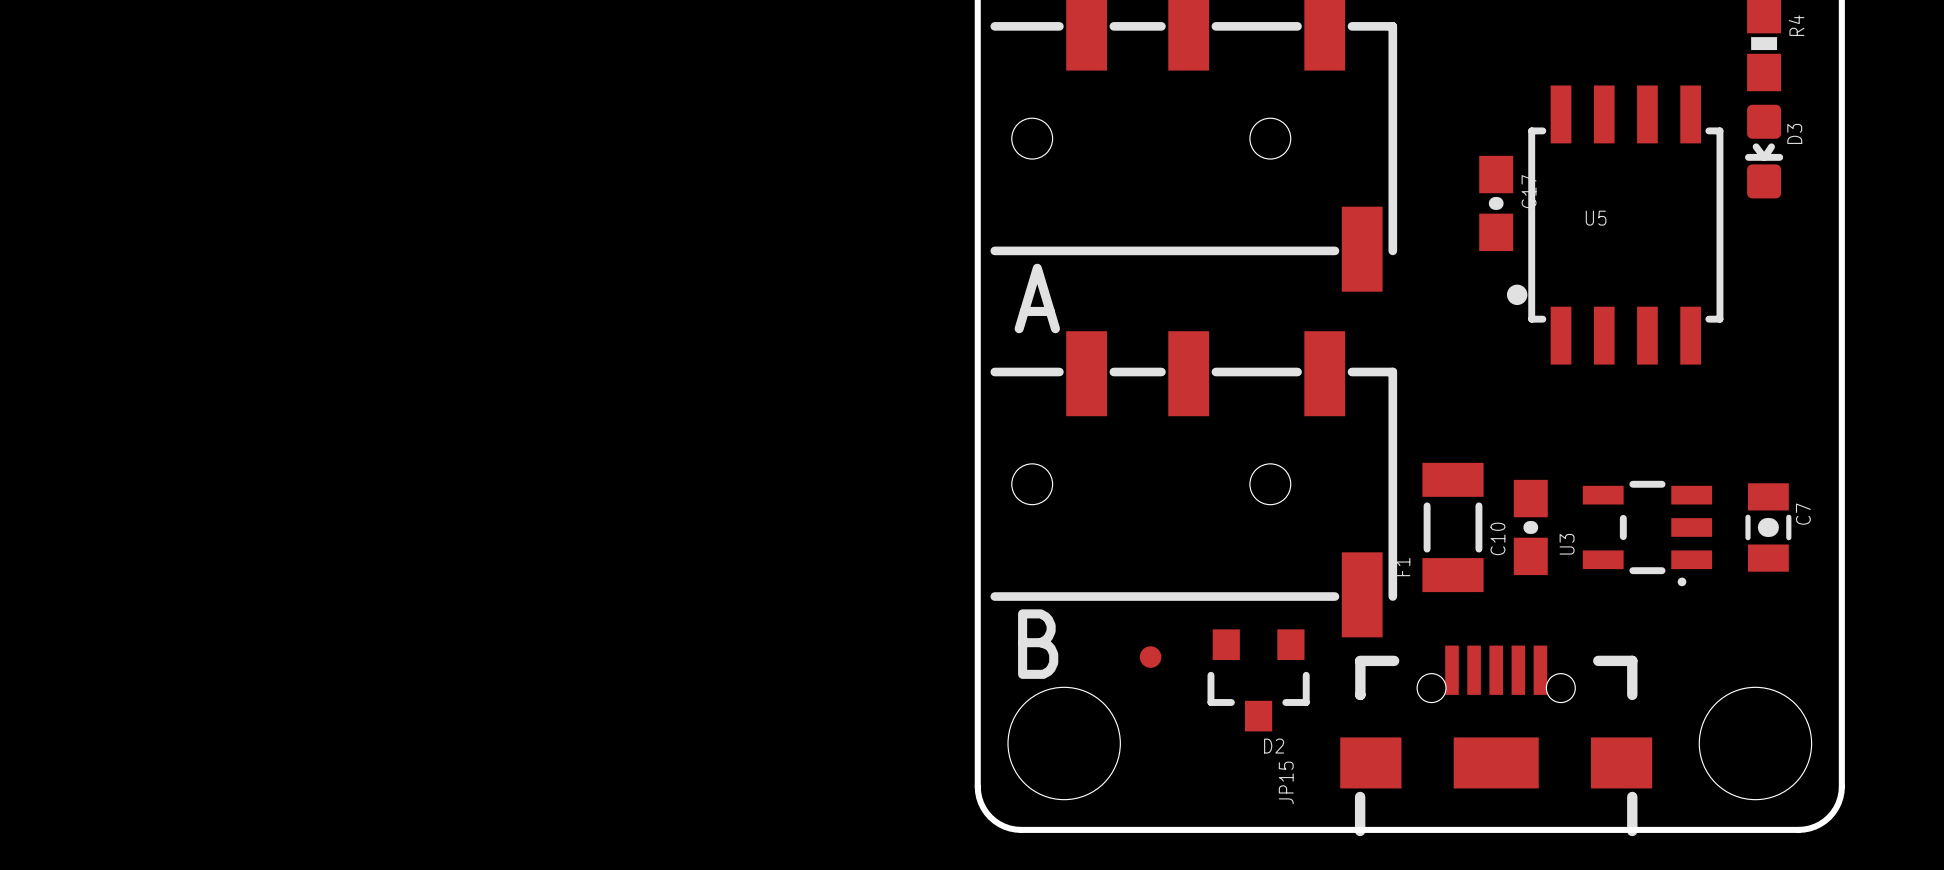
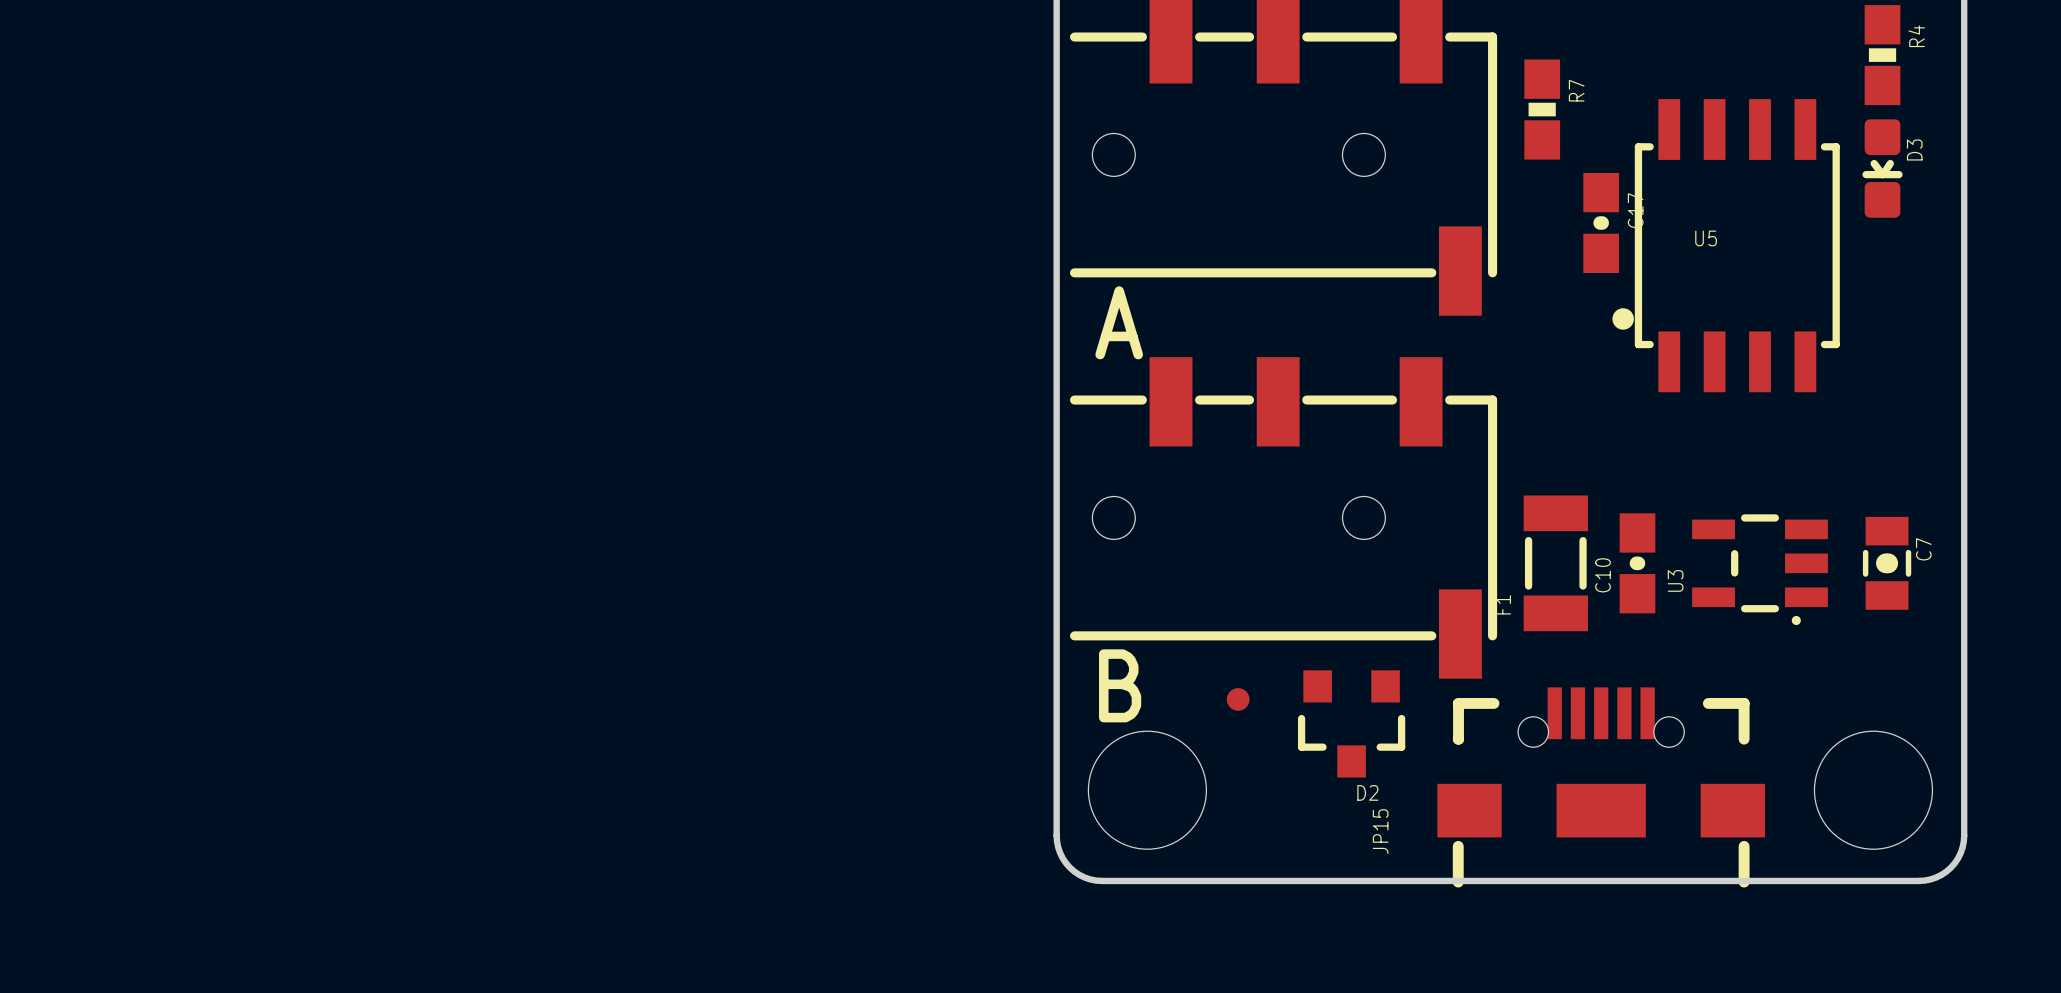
R7: none -> (1542, 109)

